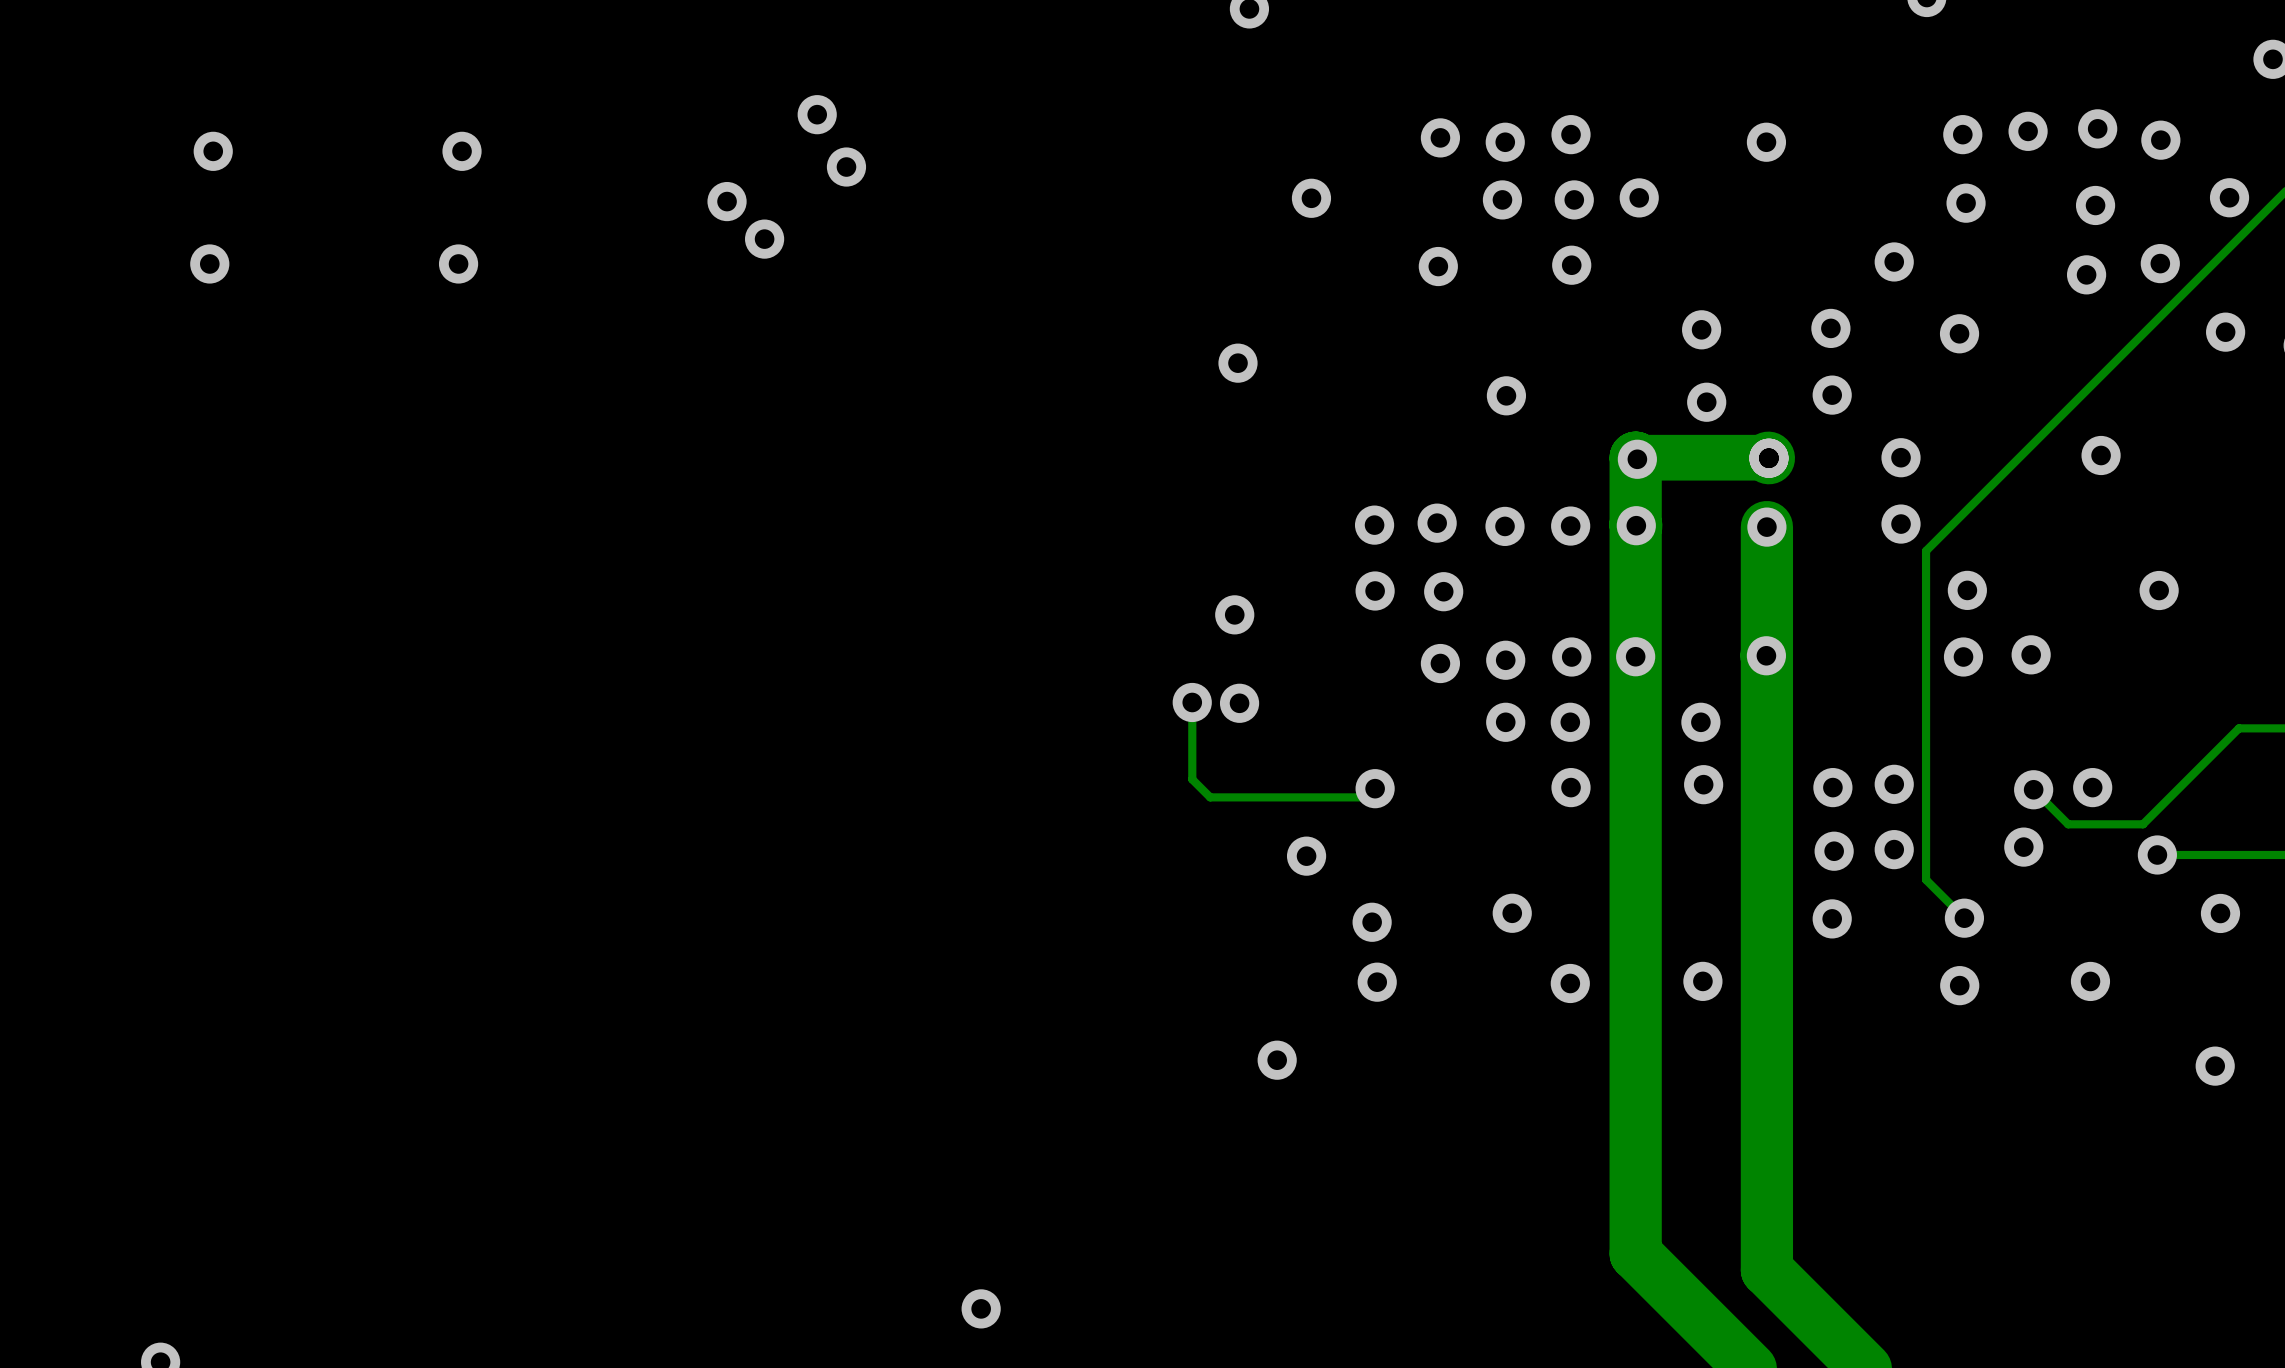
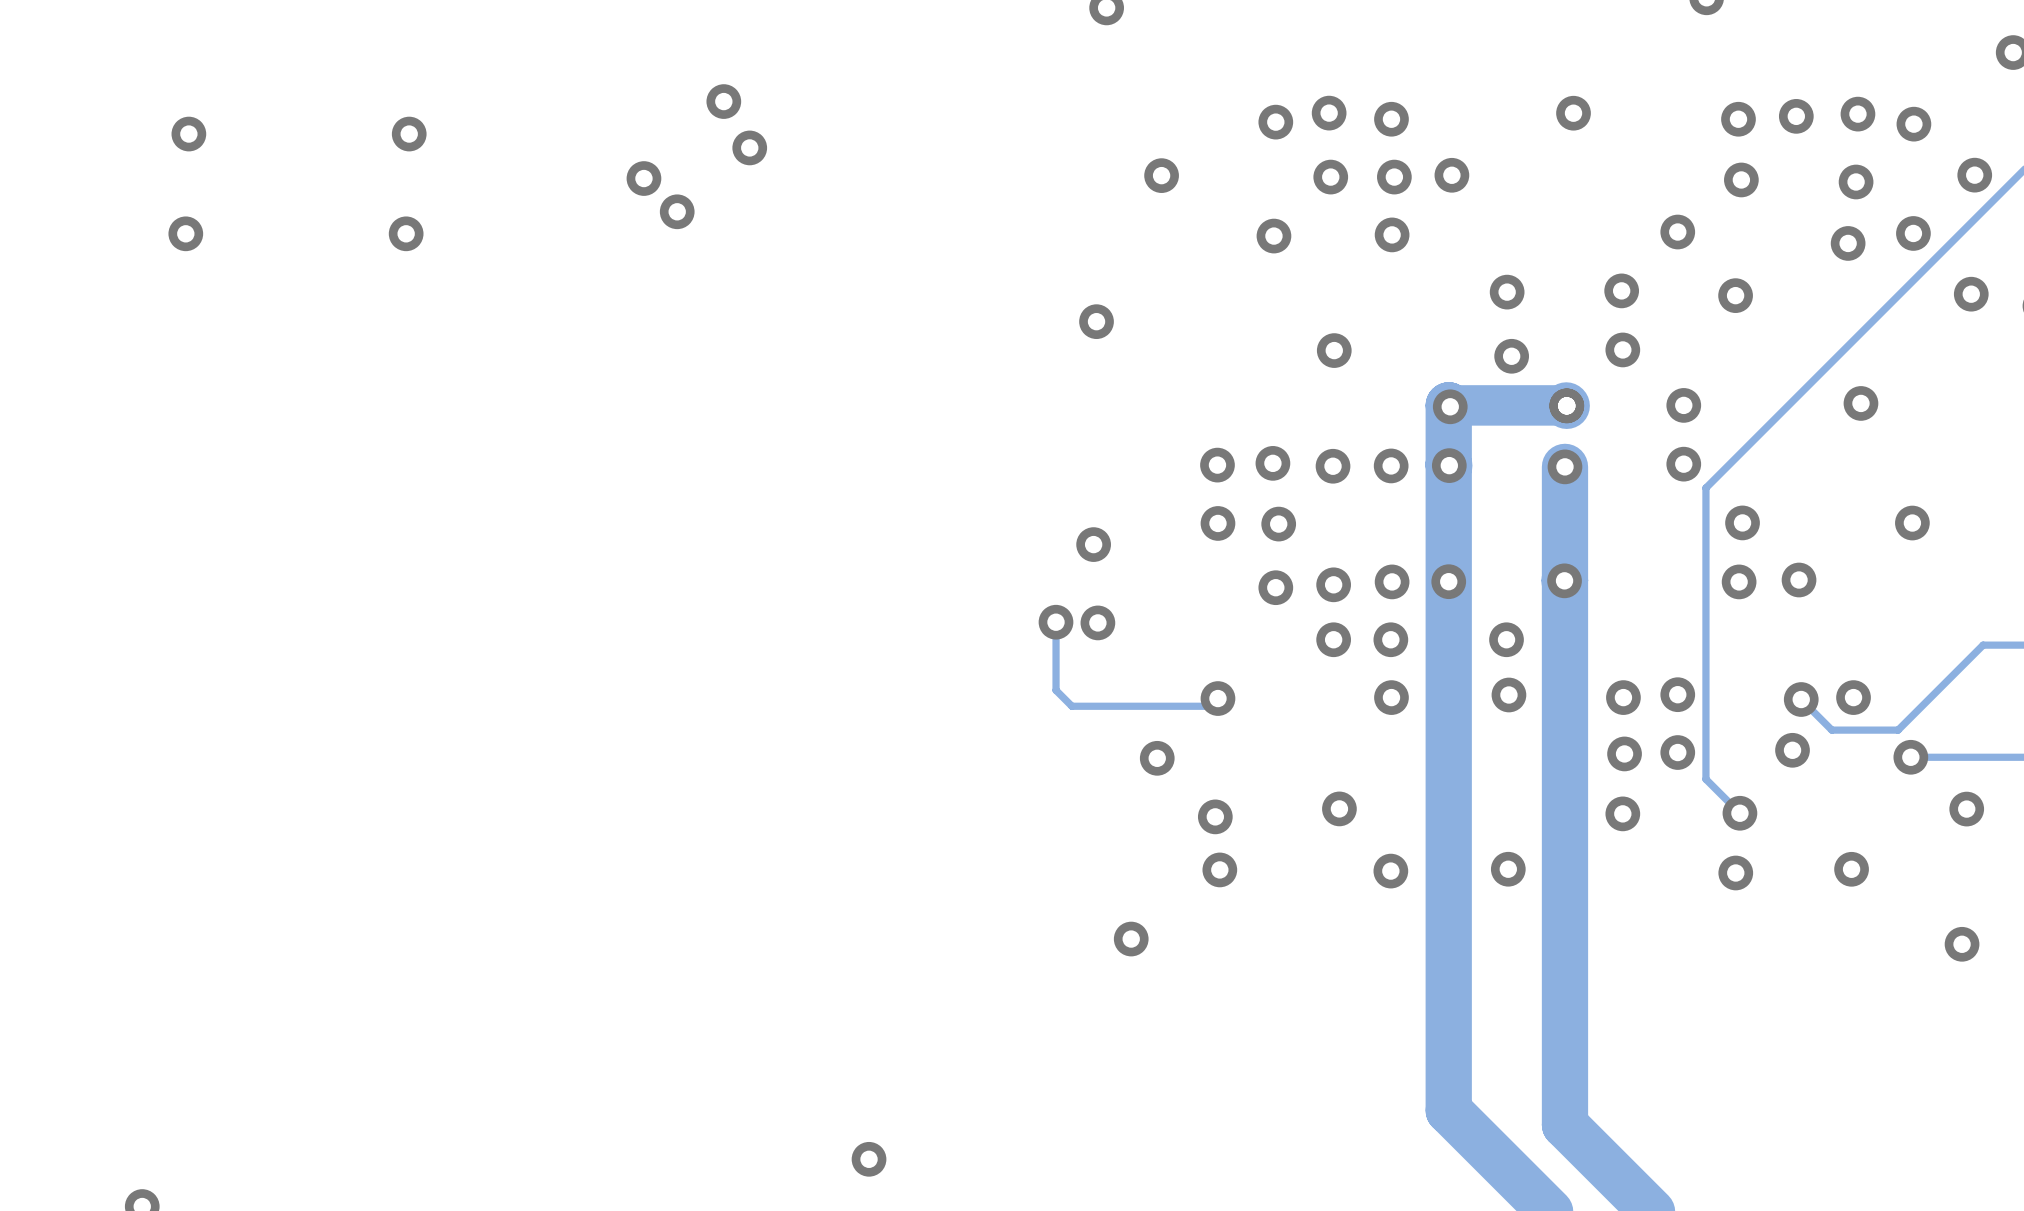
via position: (1505, 142) -> (1329, 113)
via position: (1766, 142) -> (1573, 113)

